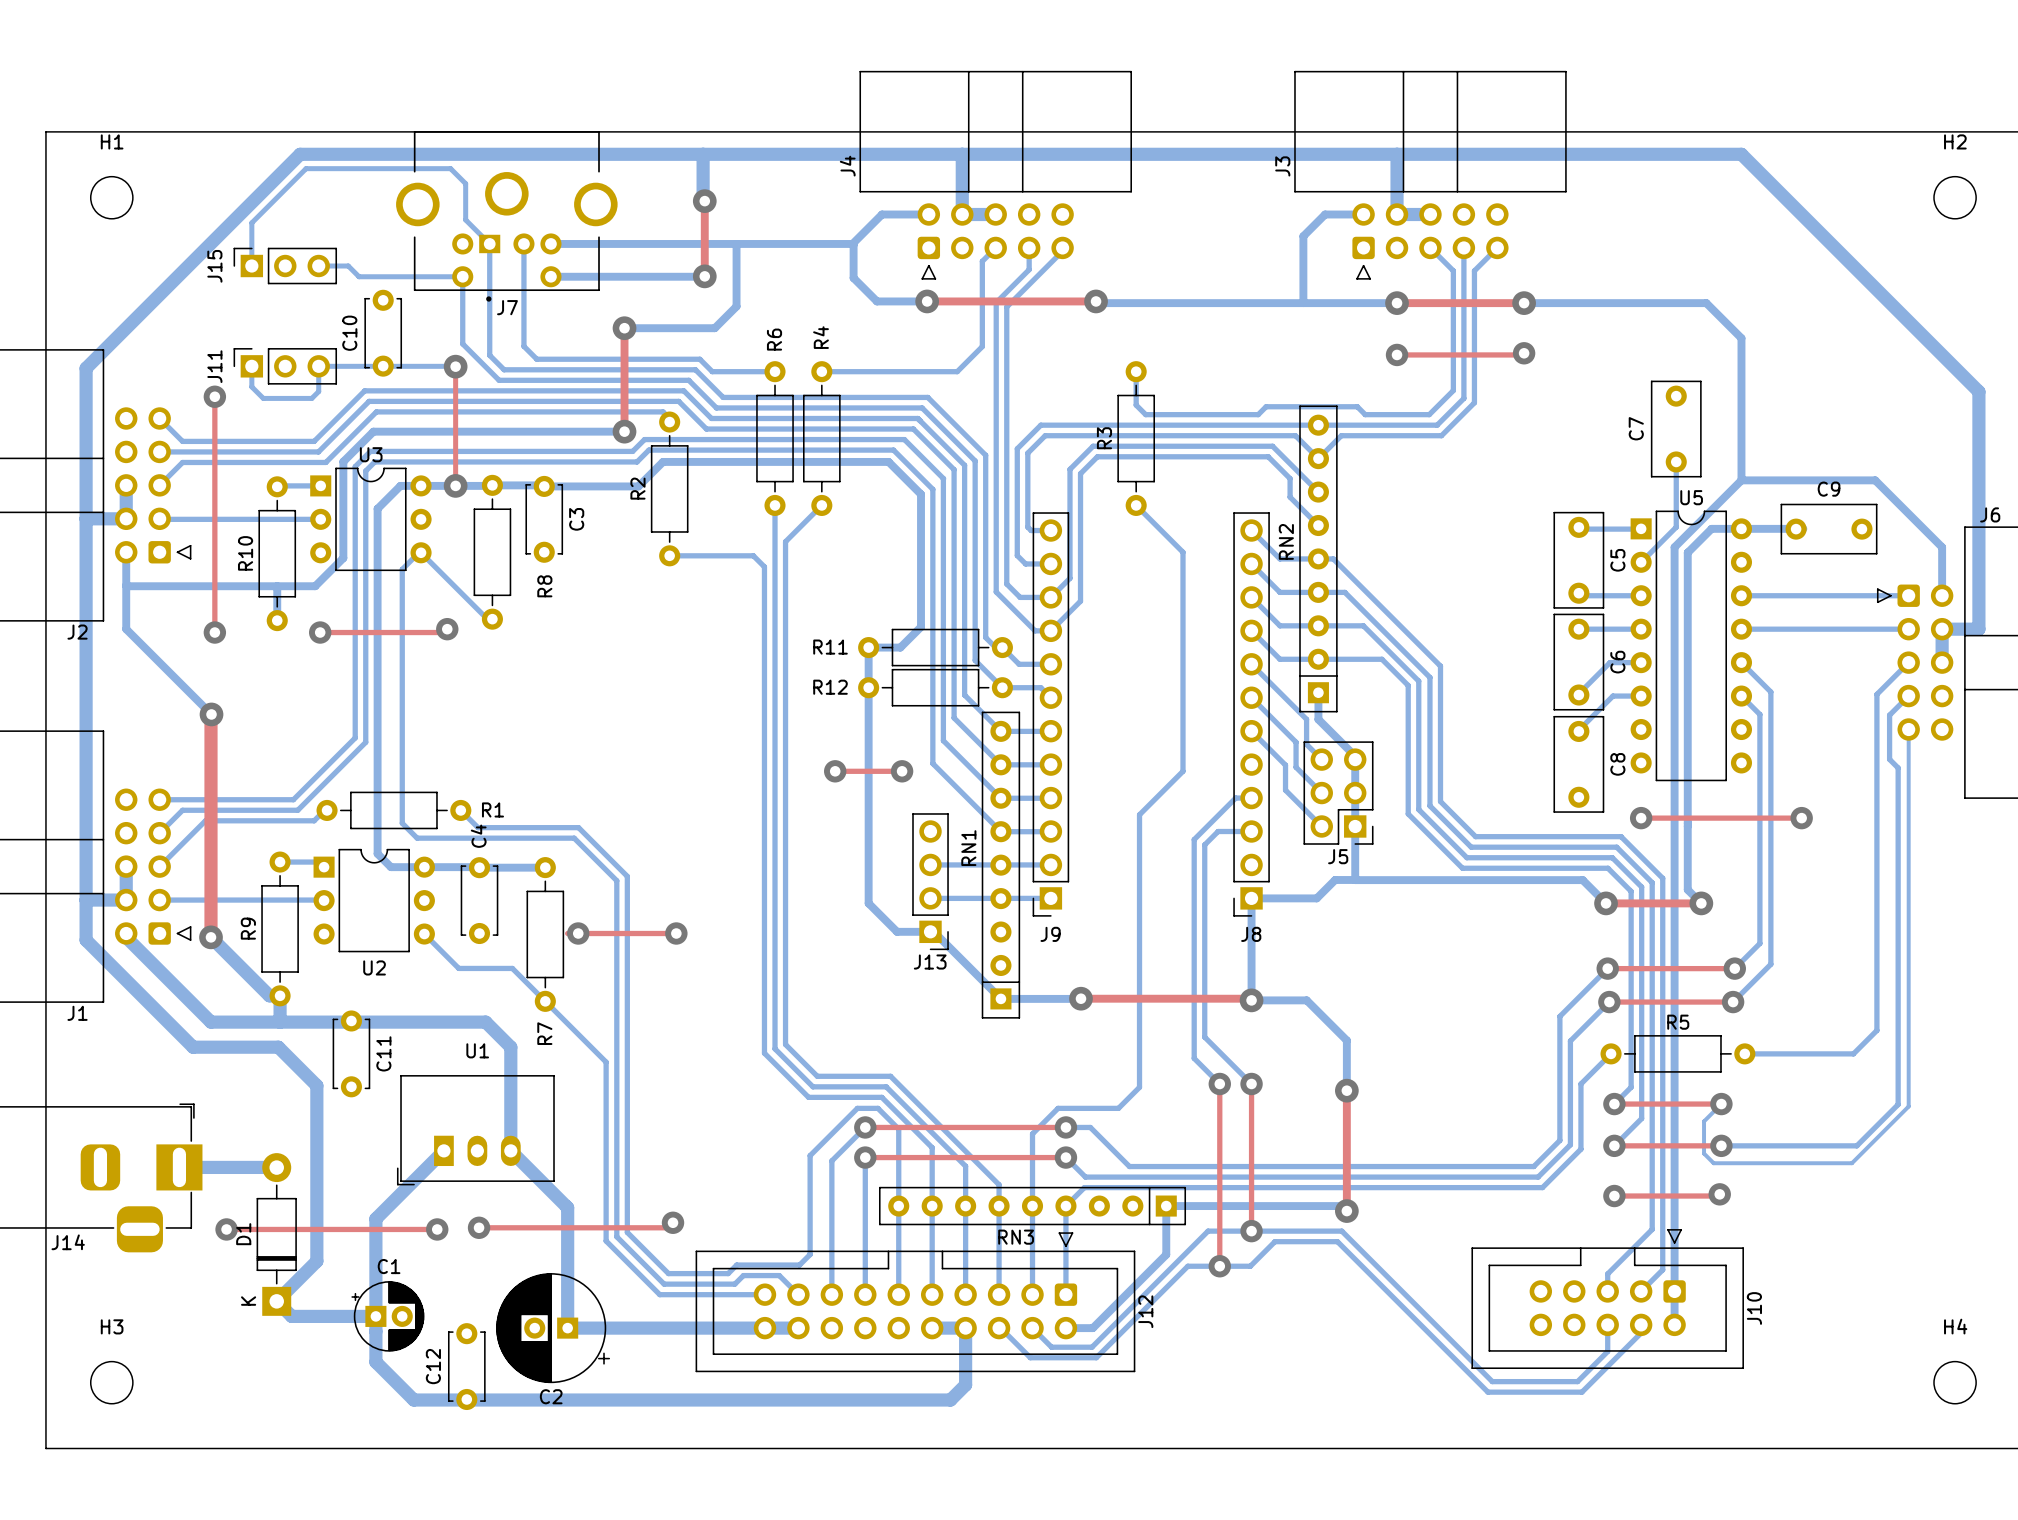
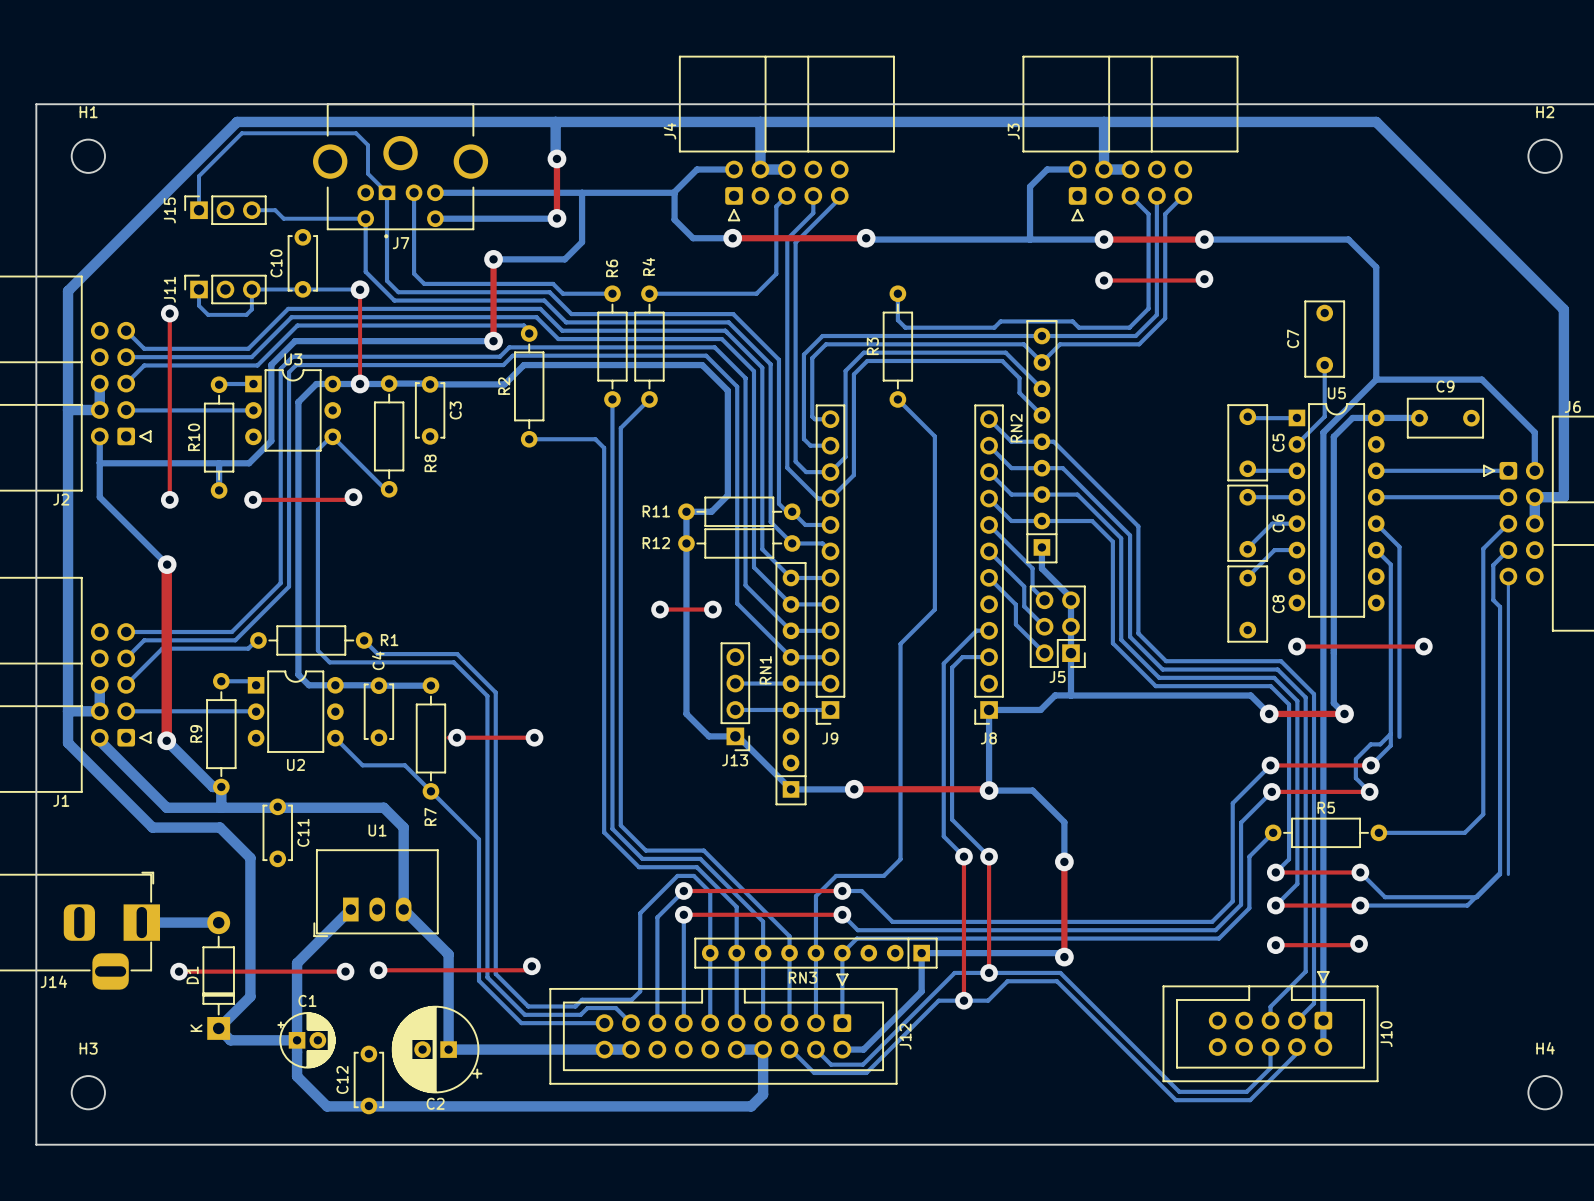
bottom track: (1770, 932) (1770, 964) (1733, 1002) -> (1390, 733) (1380, 744) (1370, 744) (1355, 759) (1355, 778) (1369, 791)
bottom track: (1721, 1104) (1704, 1121) (1704, 1153) (1713, 1163) (1851, 1163) (1908, 1106) -> (1360, 872) (1385, 897) (1477, 897) (1500, 872)

